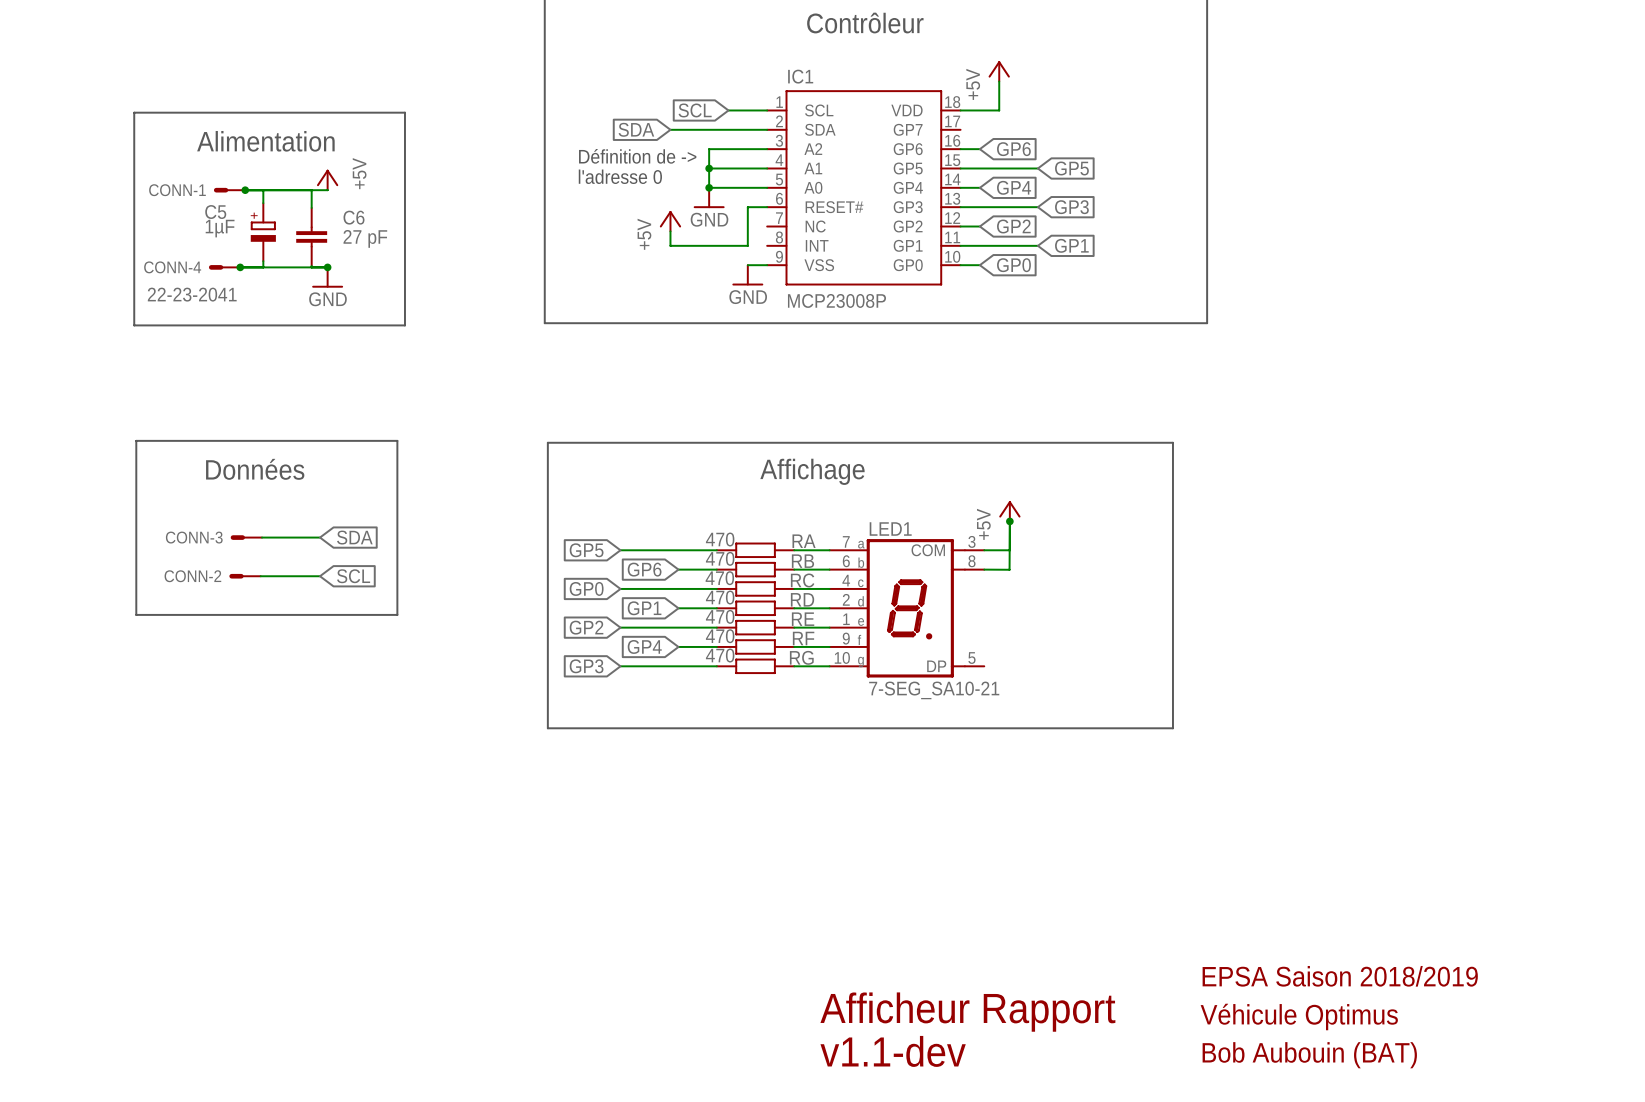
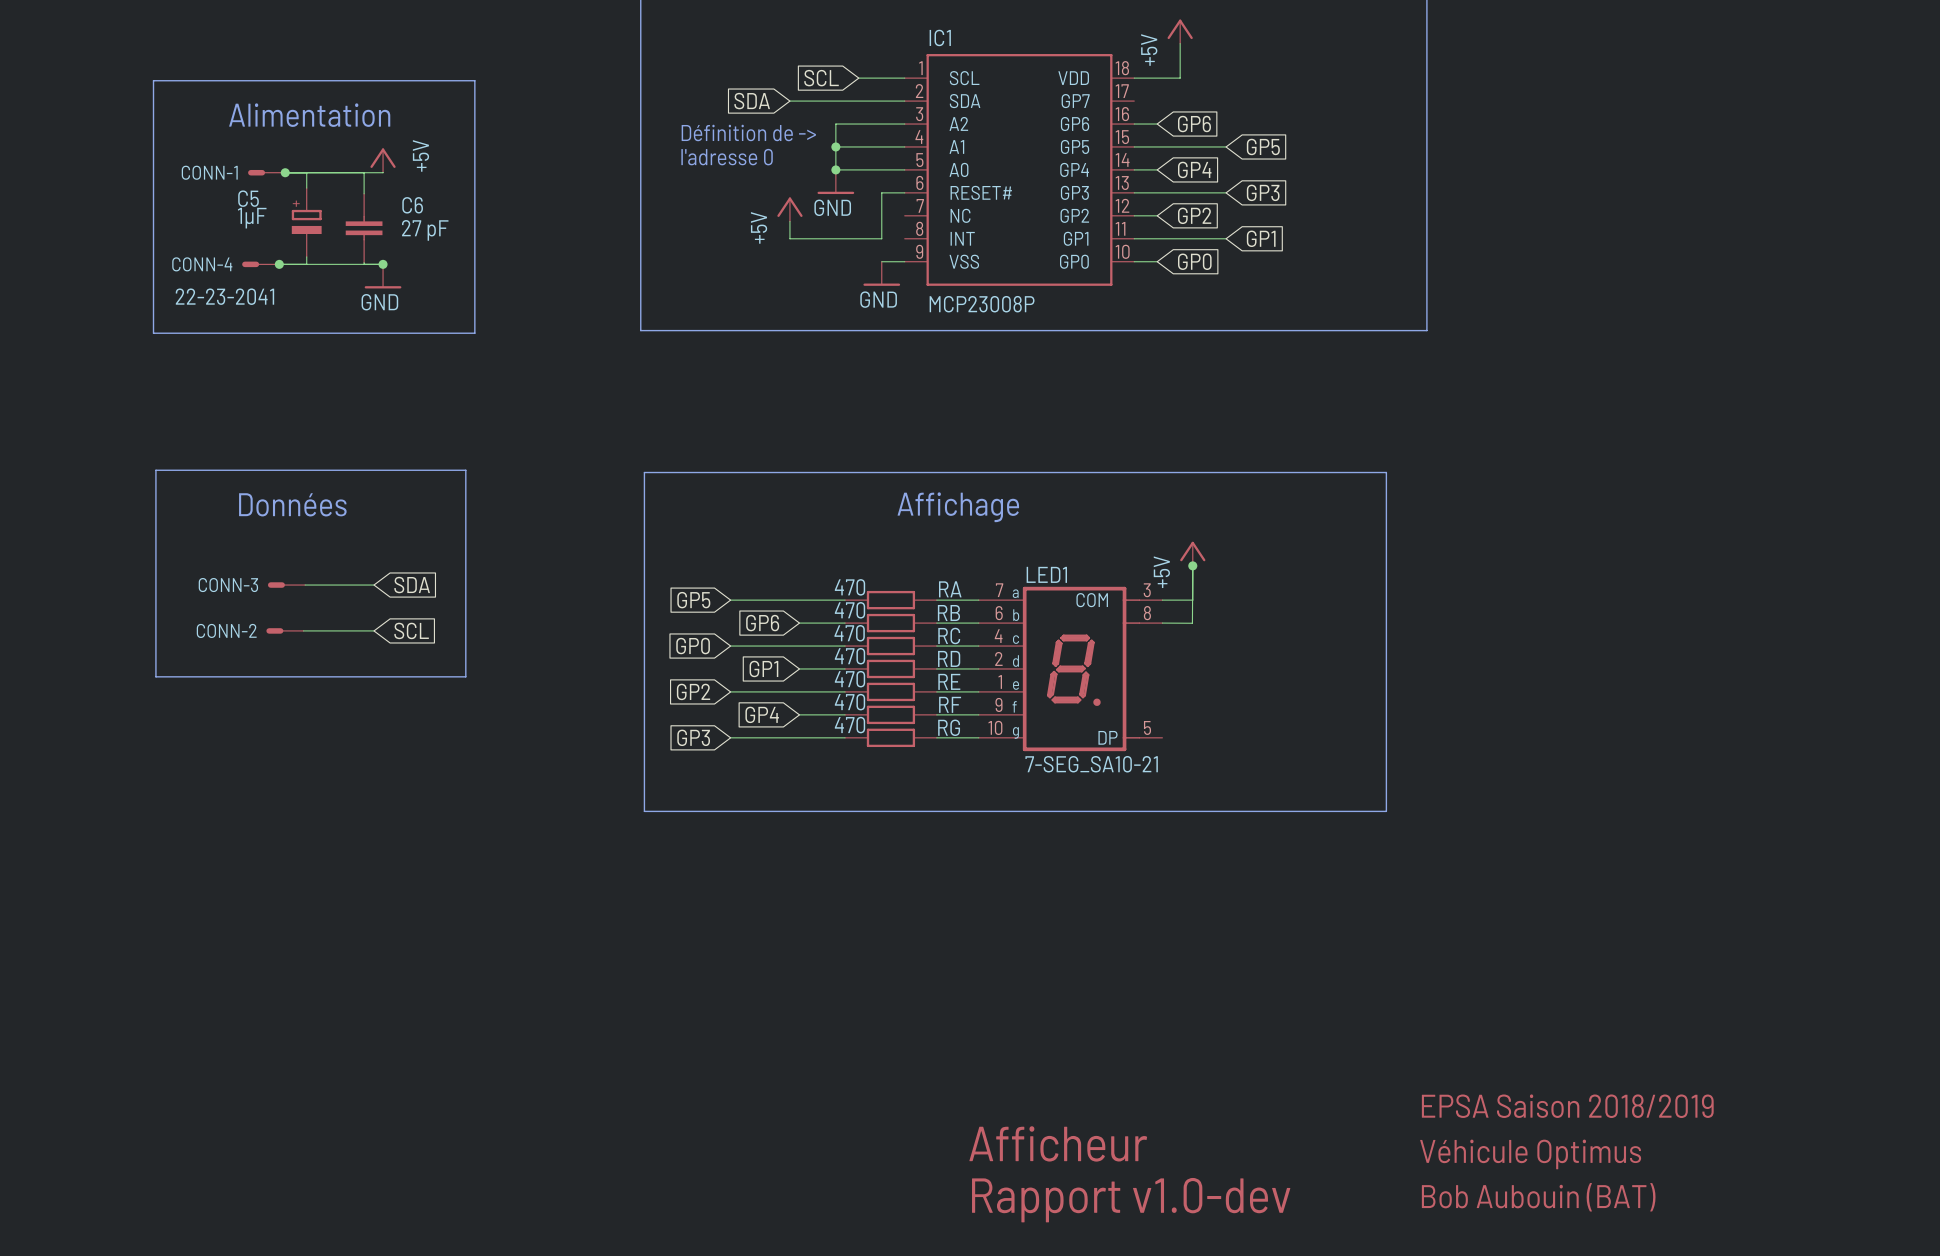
text: Afficheur Rapport (967, 1012) -> Afficheur (1058, 1143)
text: v1.1-dev (893, 1051) -> Rapport v1.0-dev (1131, 1200)

